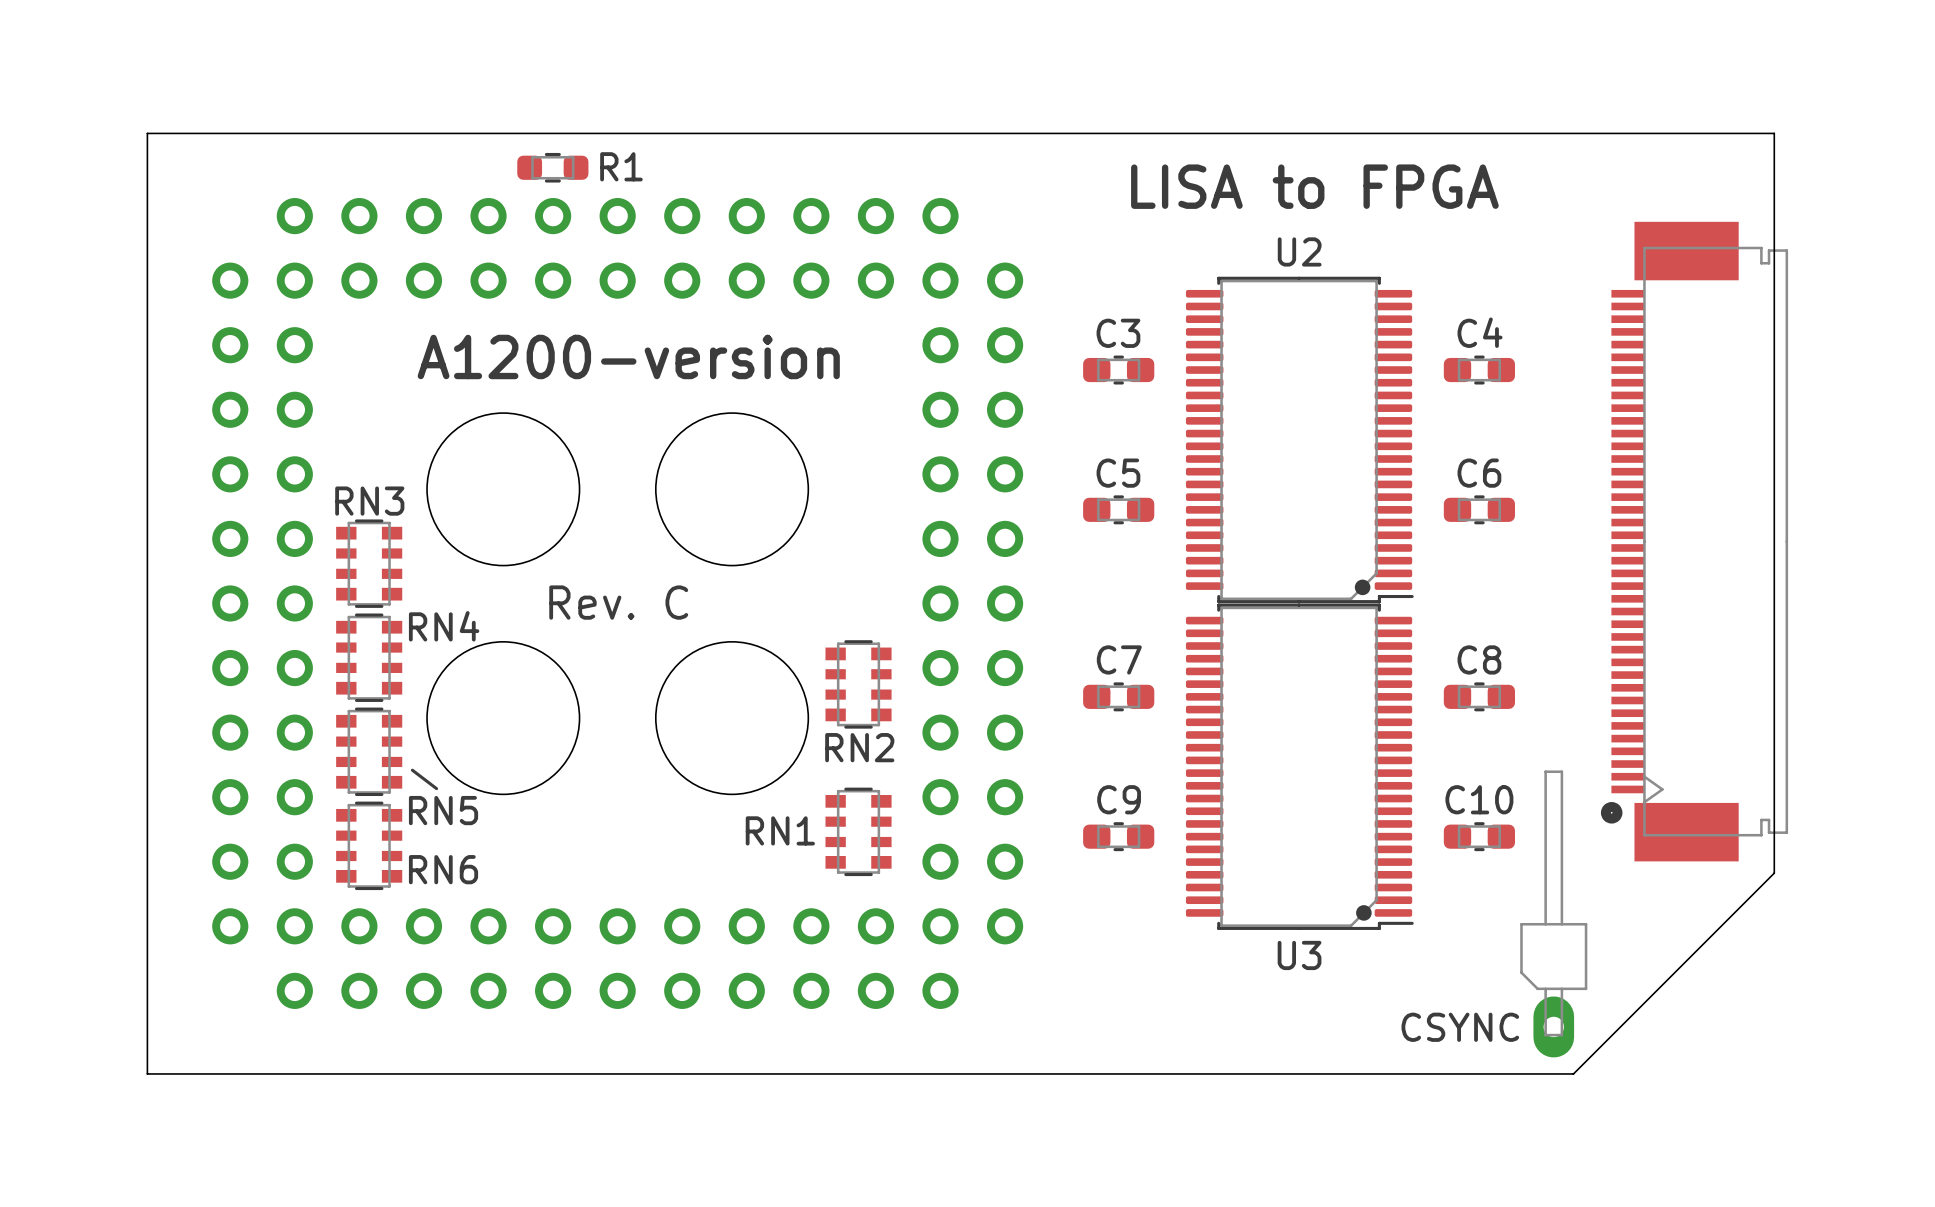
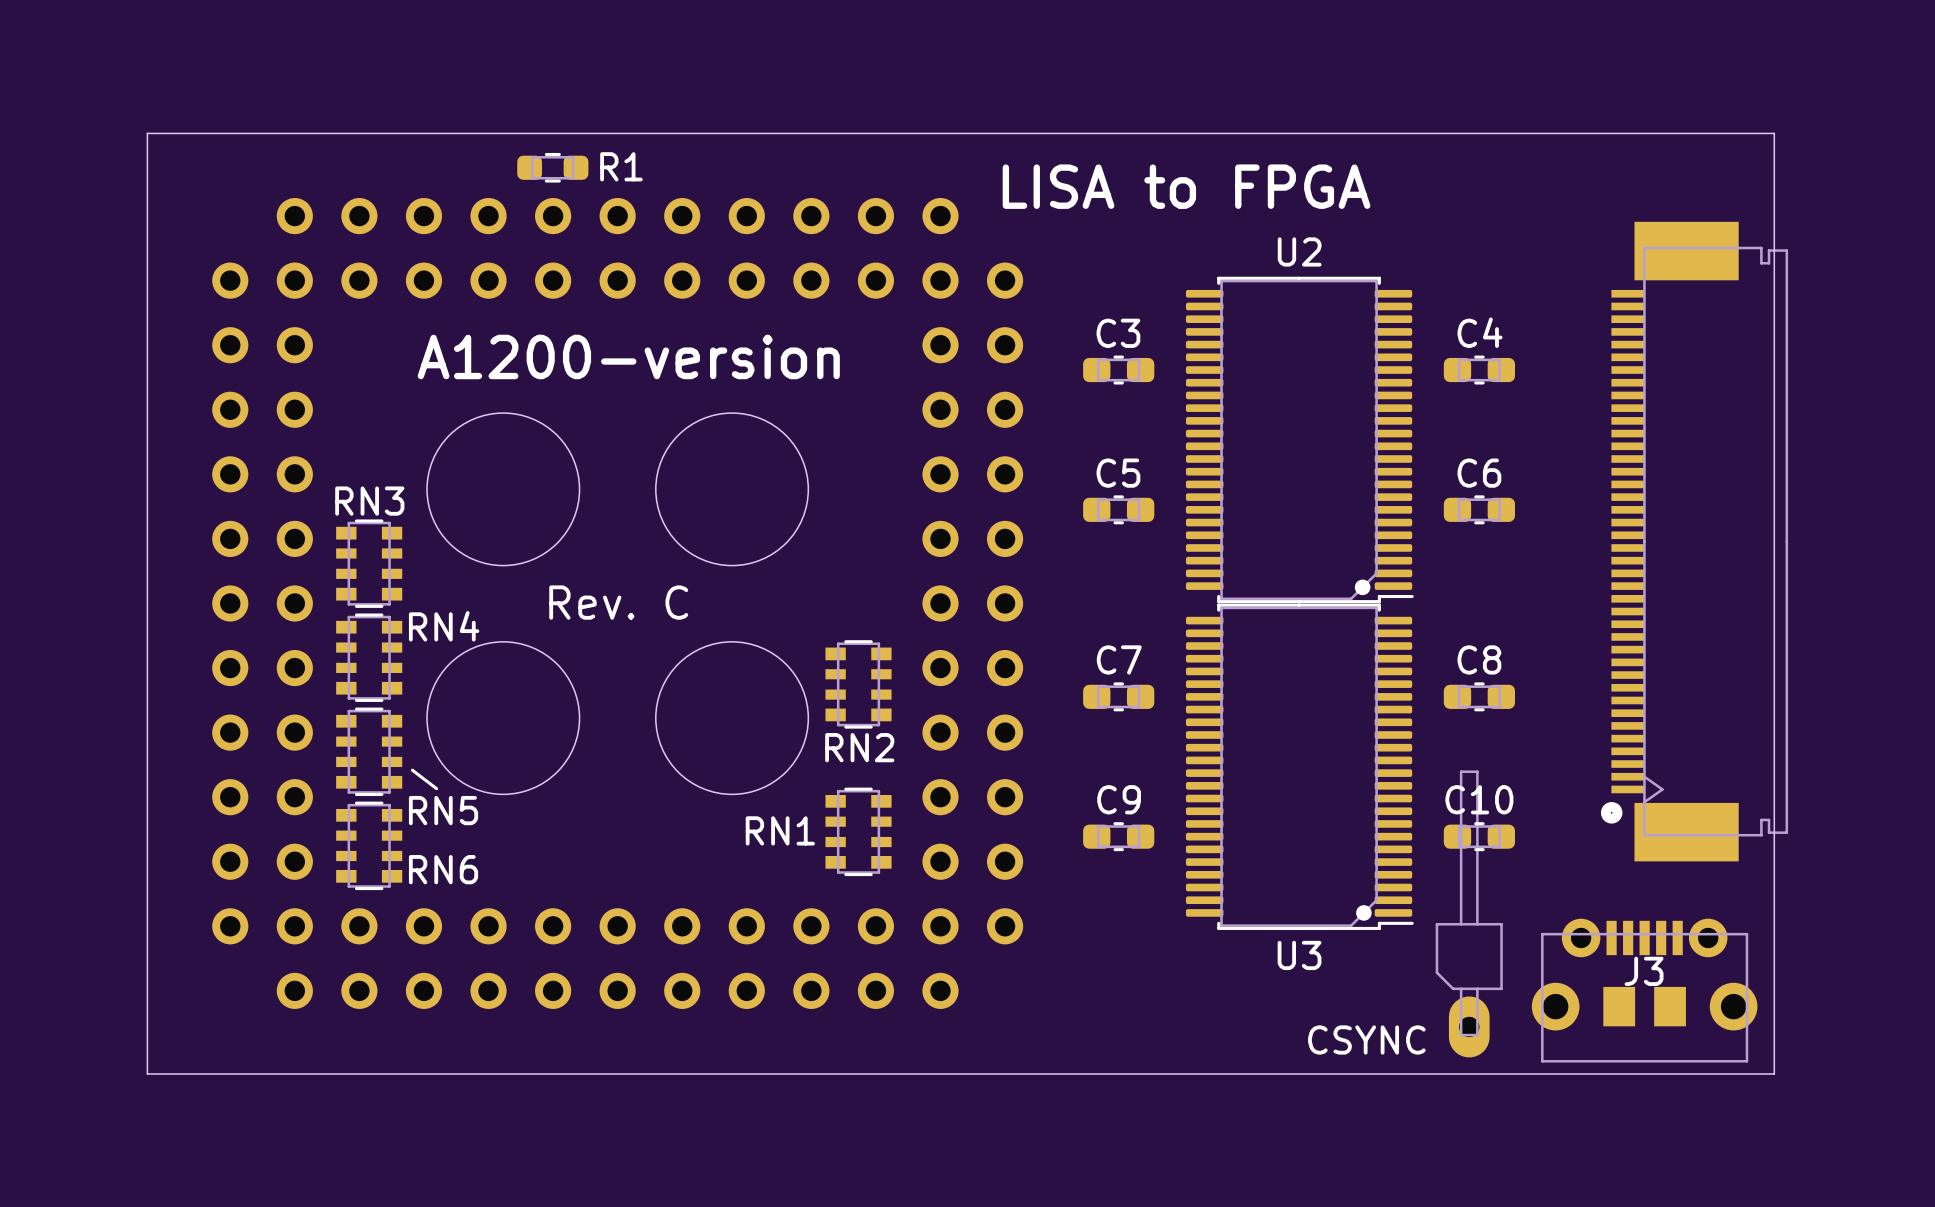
text position: LISA to FPGA (1314, 186) -> LISA to FPGA (1186, 186)
board edge: (1774, 873) (1573, 1073) -> (1774, 873) (1774, 1073) (1573, 1073)
part position: (1553, 913) -> (1469, 913)
J3: none -> (1644, 990)
text position: CSYNC (1460, 1027) -> CSYNC (1366, 1039)

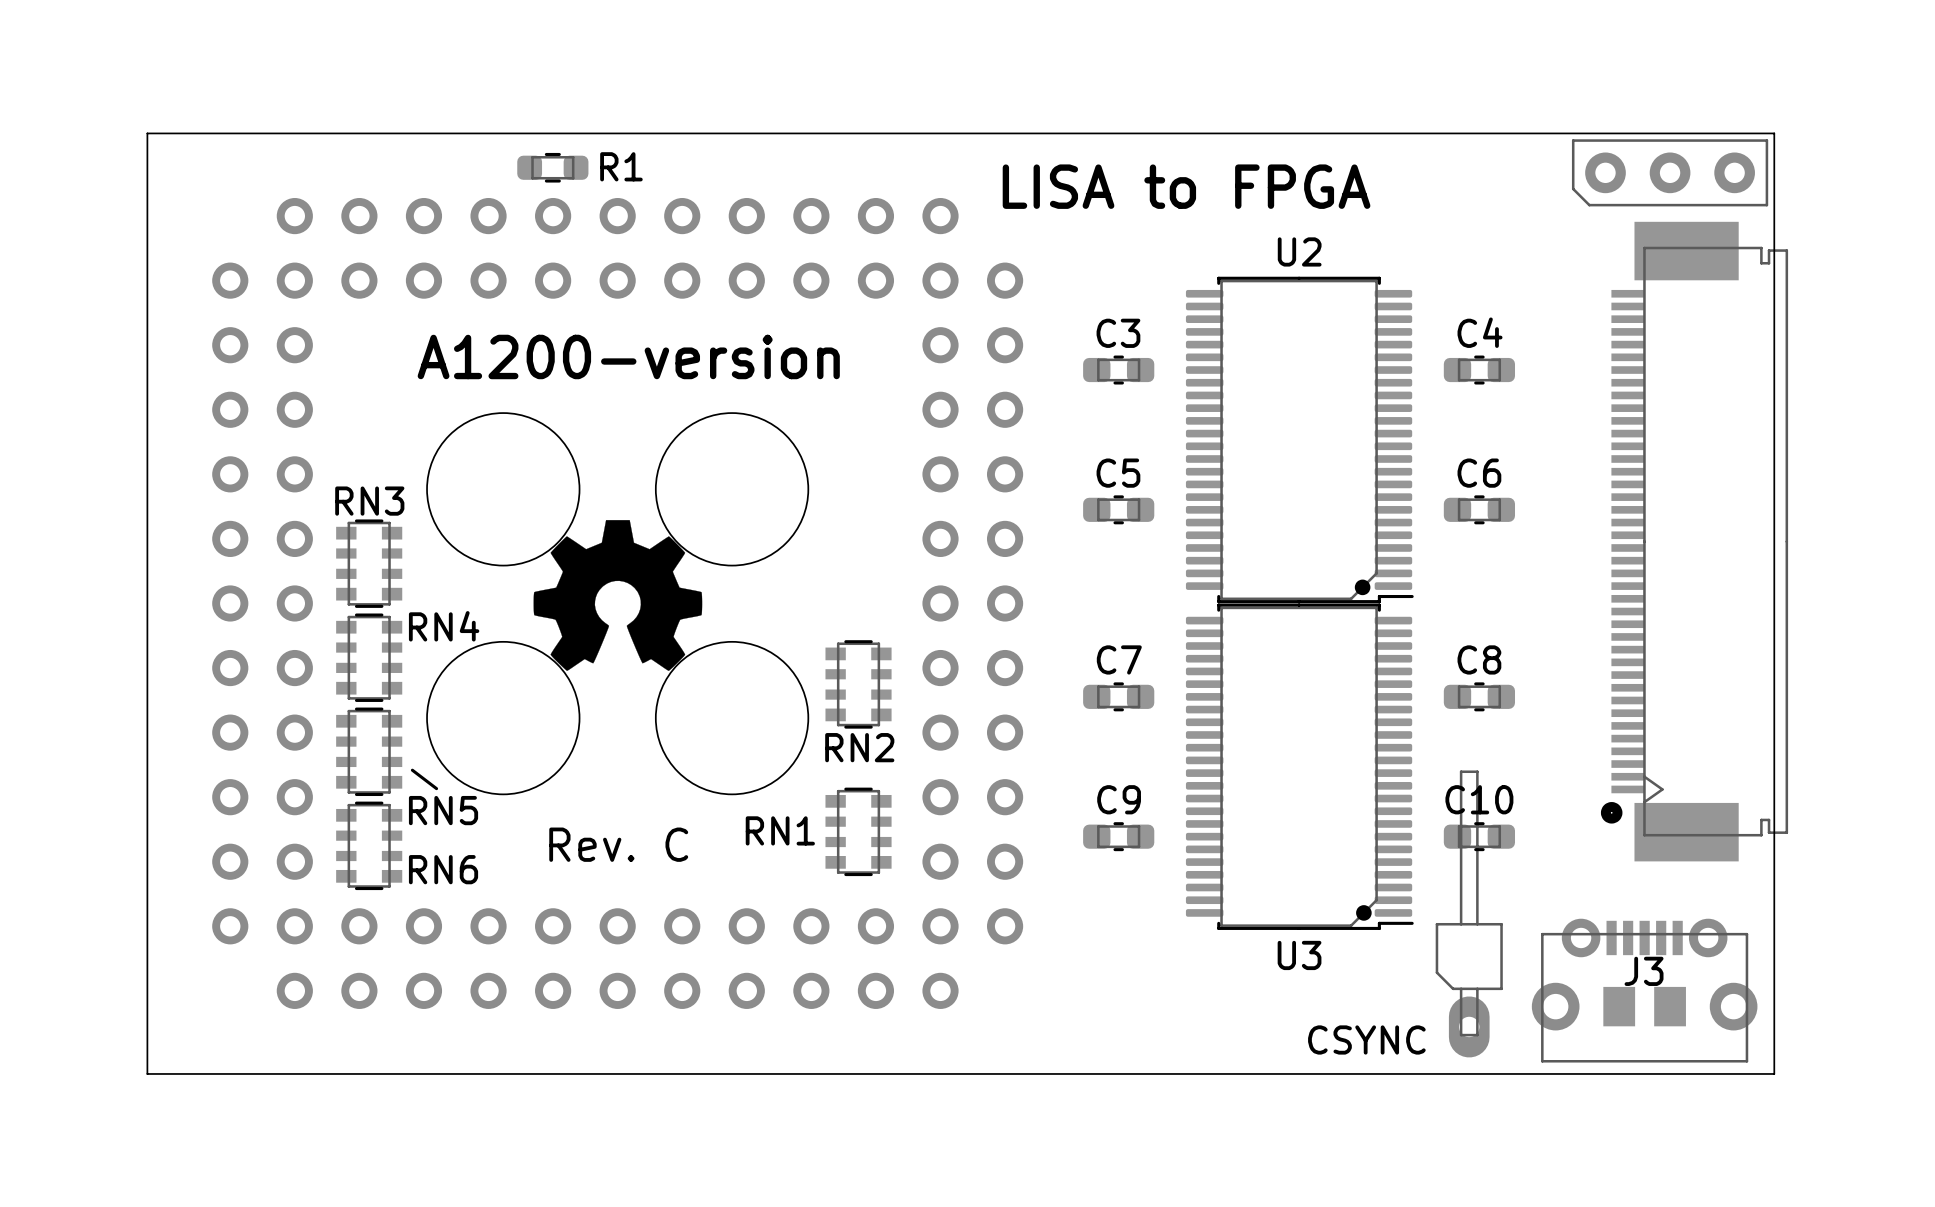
part: none -> (1670, 172)
drawing: none -> [533, 520, 703, 671]
text position: Rev. C (618, 602) -> Rev. C (618, 844)

